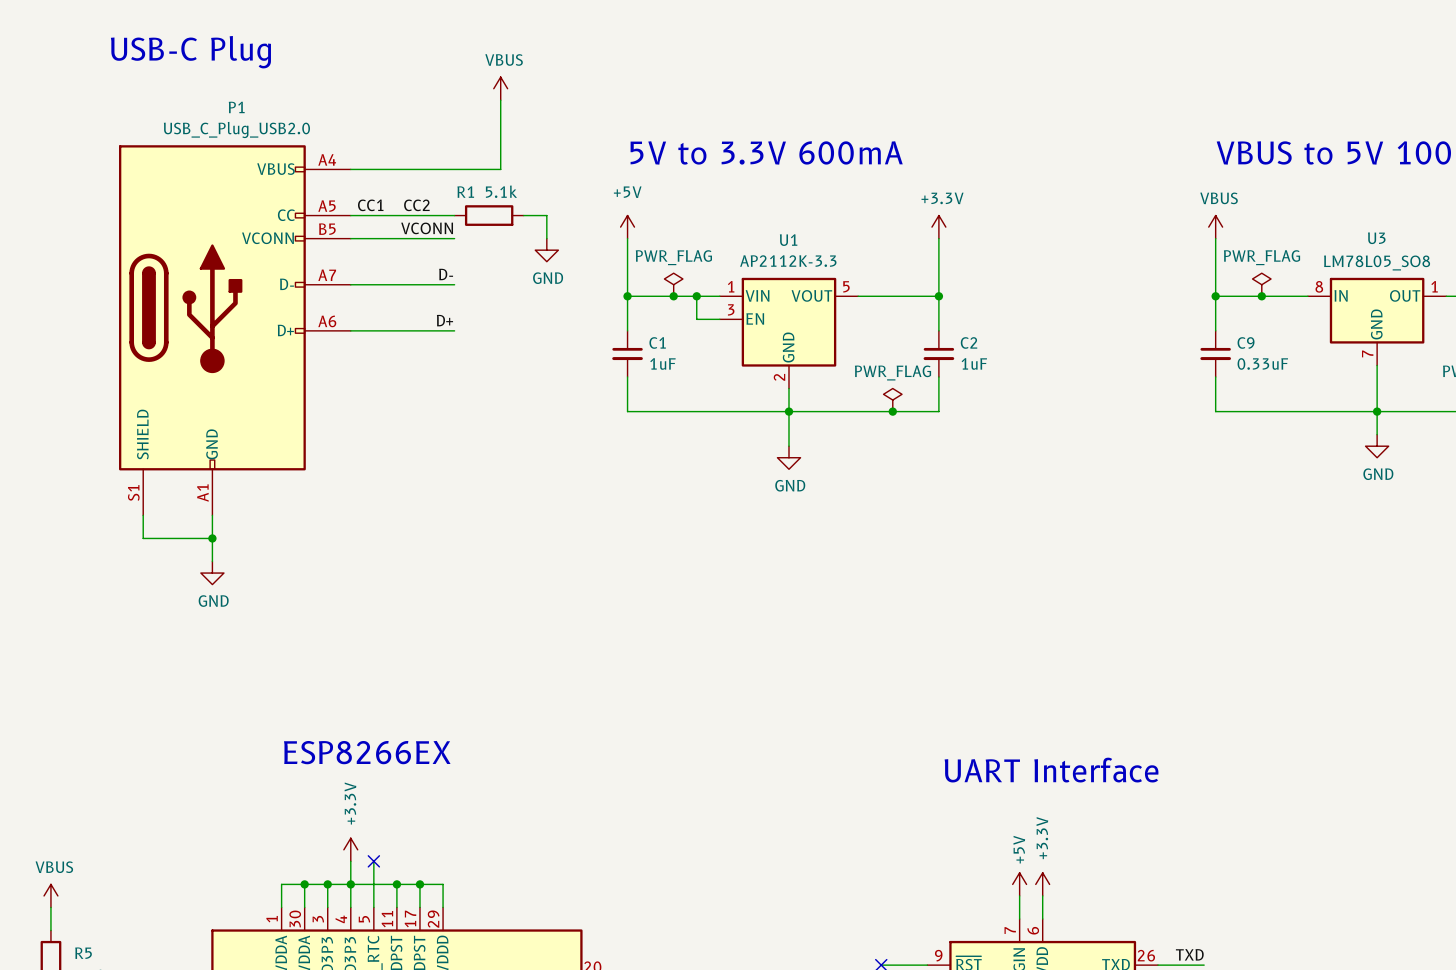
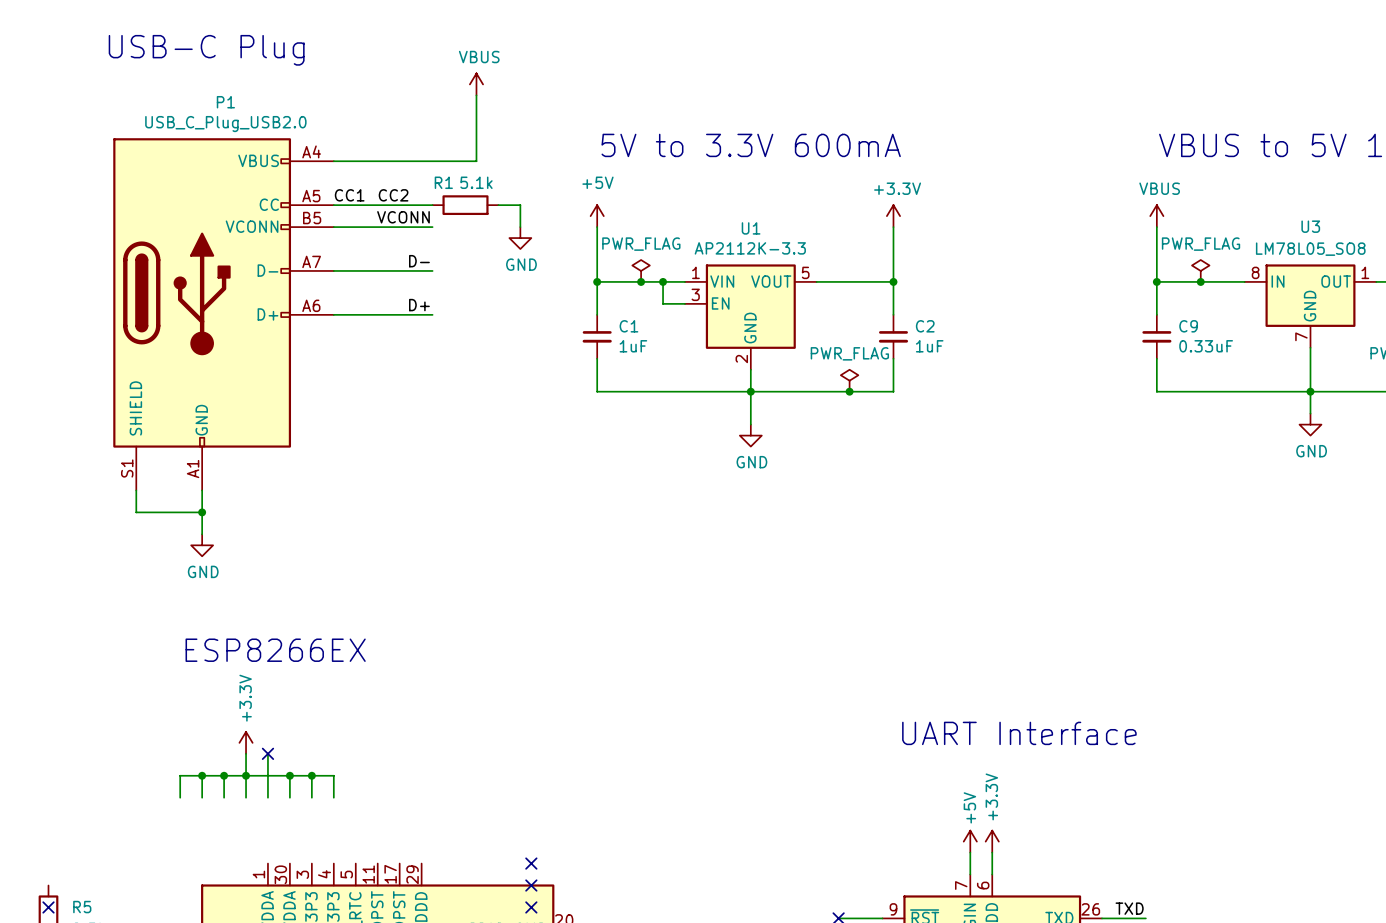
text position: ESP8266EX (367, 752) -> ESP8266EX (275, 650)
no-connect mark: none -> (267, 753)
junction: none -> (202, 775)
junction: none -> (224, 775)
junction: none -> (246, 775)
junction: none -> (289, 775)
junction: none -> (311, 775)
power symbol position: +3.3V (350, 849) -> +3.3V (246, 742)
wire: (350, 861) (350, 907) -> (246, 753) (246, 797)
wire: (373, 861) (373, 907) -> (267, 753) (267, 797)
no-connect mark: (373, 861) -> none
wire: (304, 884) (304, 907) -> (202, 775) (202, 797)
junction: (304, 884) -> none
wire: (327, 884) (327, 907) -> (224, 775) (224, 797)
junction: (327, 884) -> none
junction: (350, 884) -> none
wire: (396, 884) (396, 907) -> (289, 775) (289, 797)
junction: (396, 884) -> none
wire: (419, 884) (419, 907) -> (311, 775) (311, 797)
junction: (419, 884) -> none
power symbol: VBUS (50, 895) -> none
wire: (50, 907) (50, 930) -> none
wire: (281, 907) (281, 884) (443, 884) (443, 907) -> (180, 797) (180, 775) (333, 775) (333, 797)
no-connect mark: none -> (531, 863)
no-connect mark: none -> (531, 885)
no-connect mark: none -> (48, 907)
no-connect mark: none -> (531, 907)

